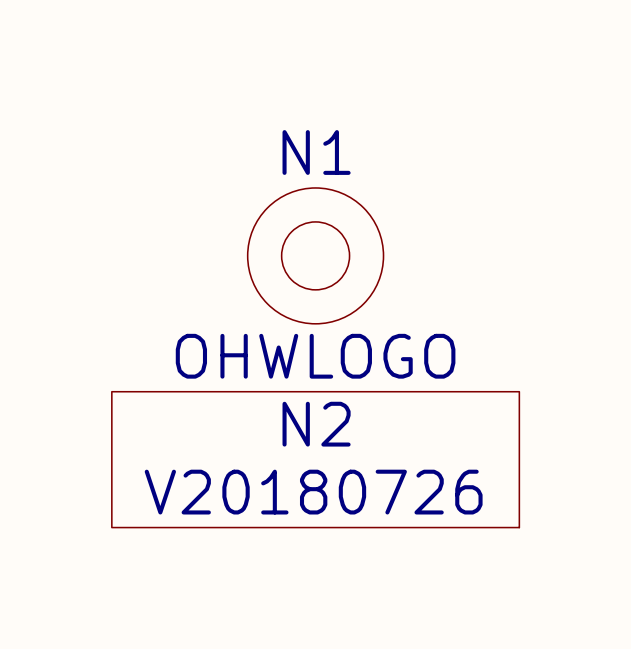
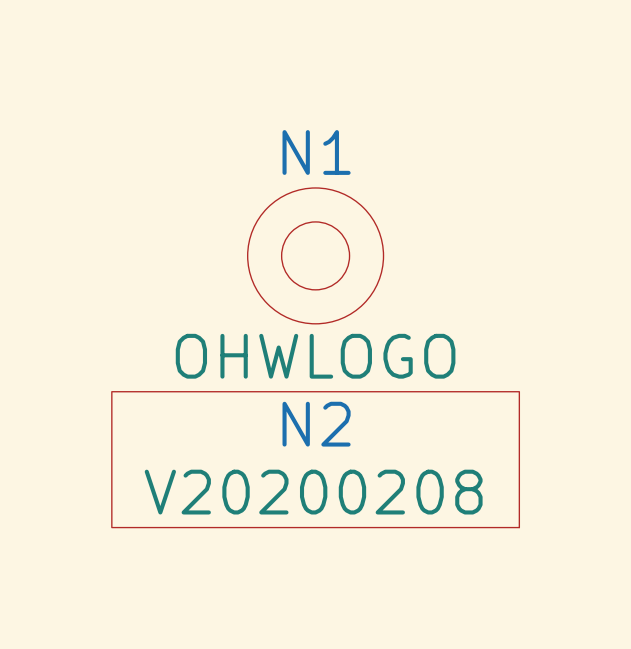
N2 value: V20180726 (313, 492) -> V20200208 (313, 492)

